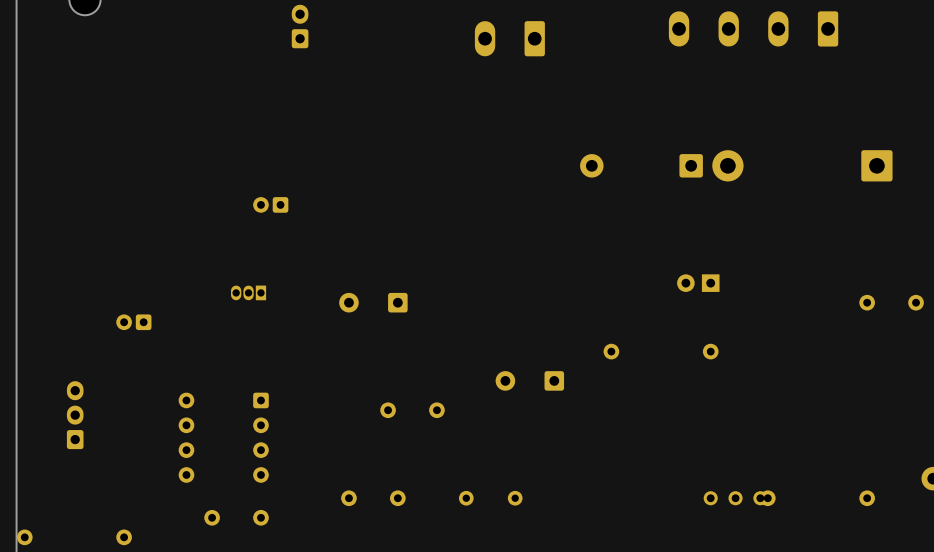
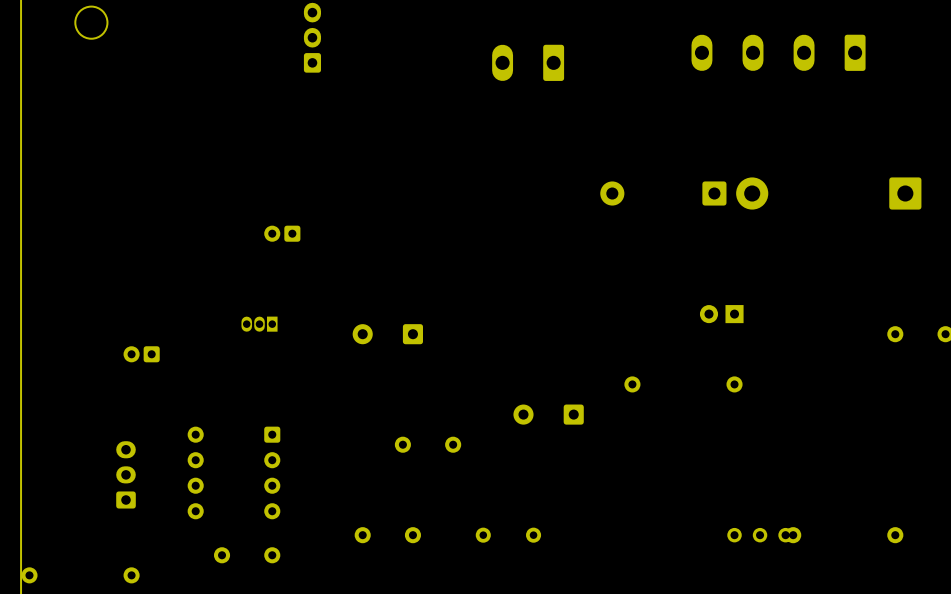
part: (75, 415) -> none
part: none -> (126, 474)

